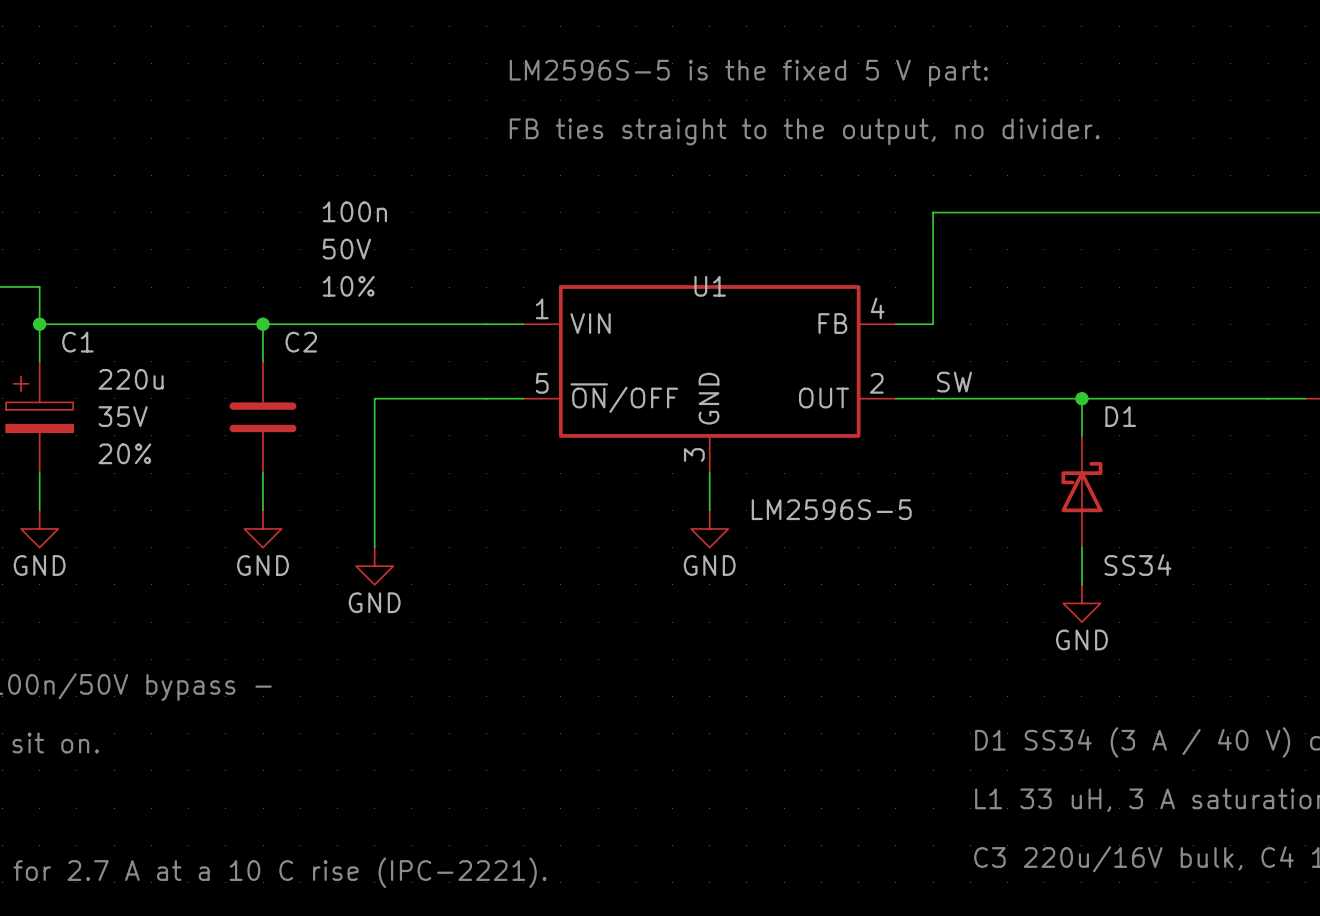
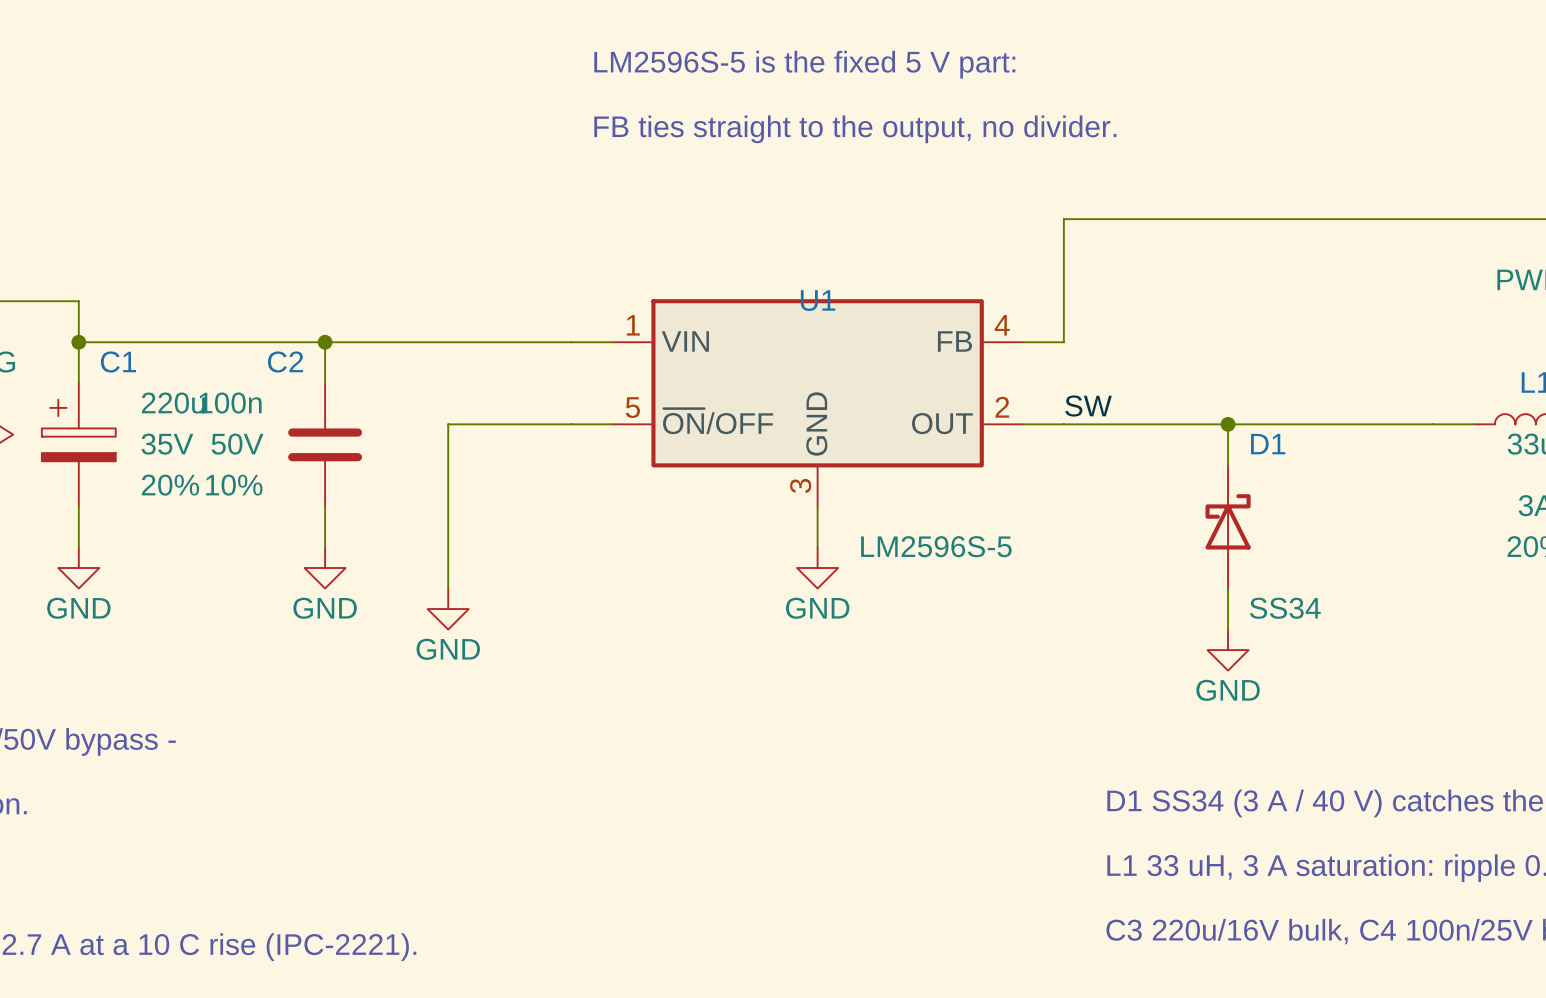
C2 value position: 100n (354, 211) -> 100n (230, 403)
C2 text position: 50V (346, 249) -> 50V (237, 444)
C2 text position: 10% (348, 286) -> 10% (234, 485)
C2 name position: C2 (301, 342) -> C2 (285, 362)

